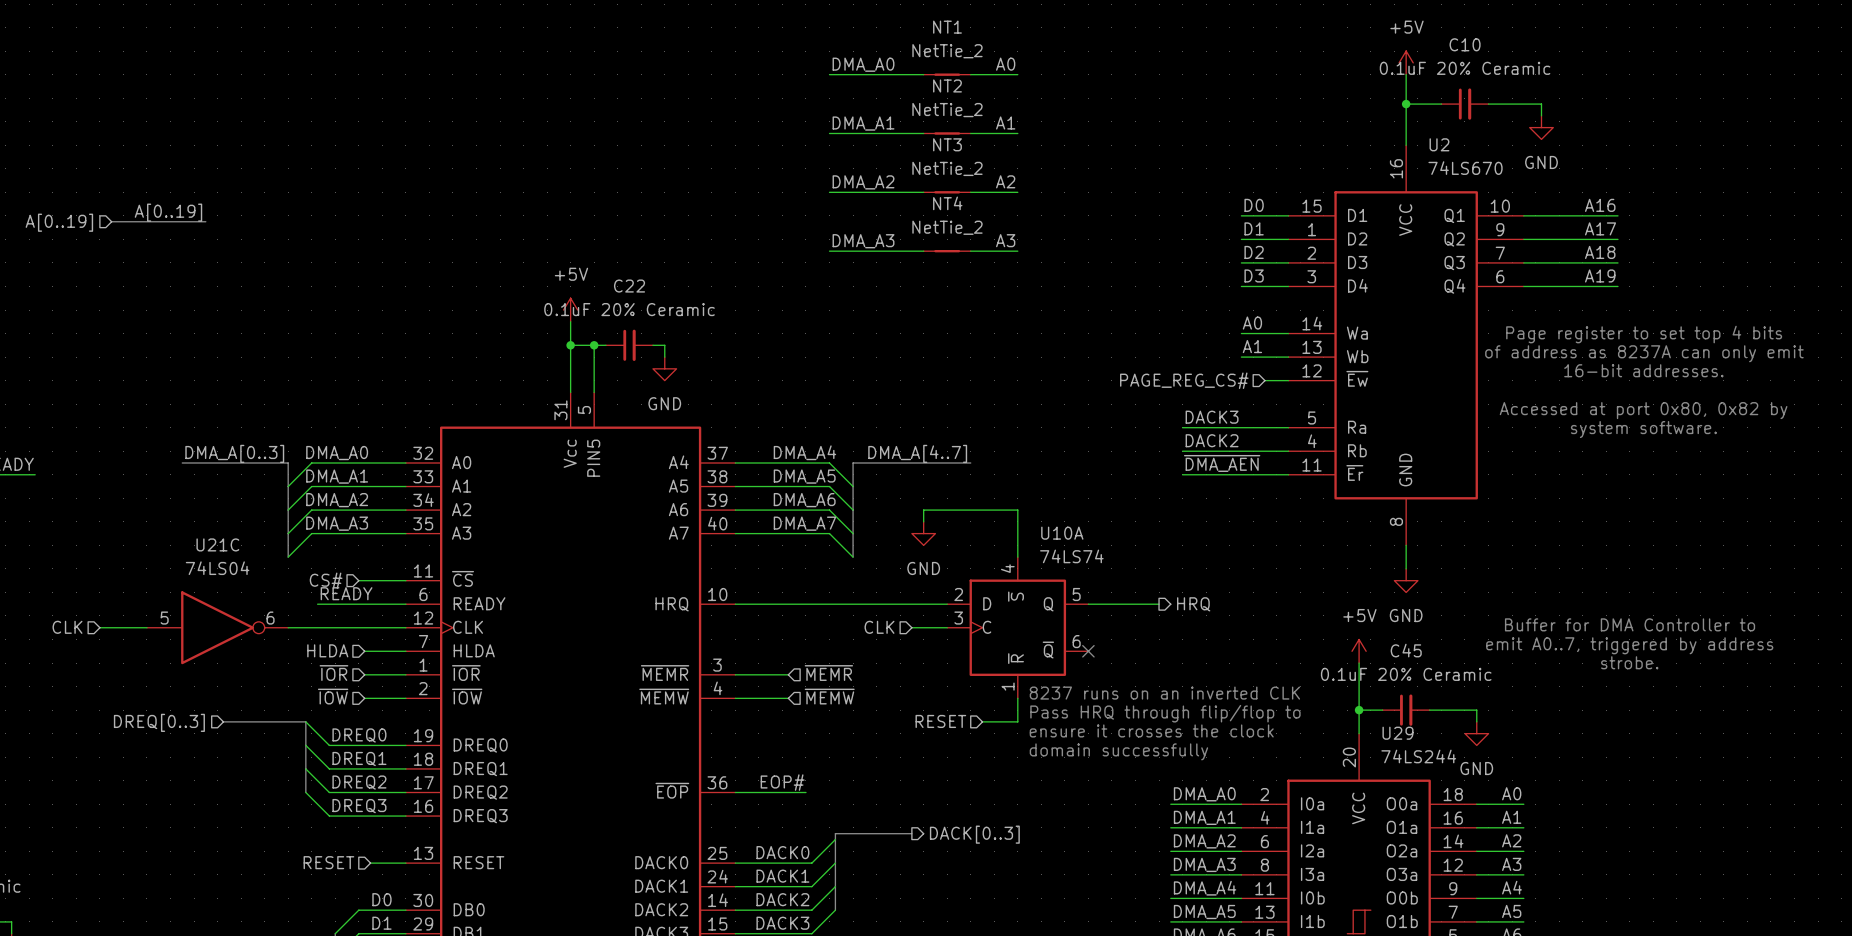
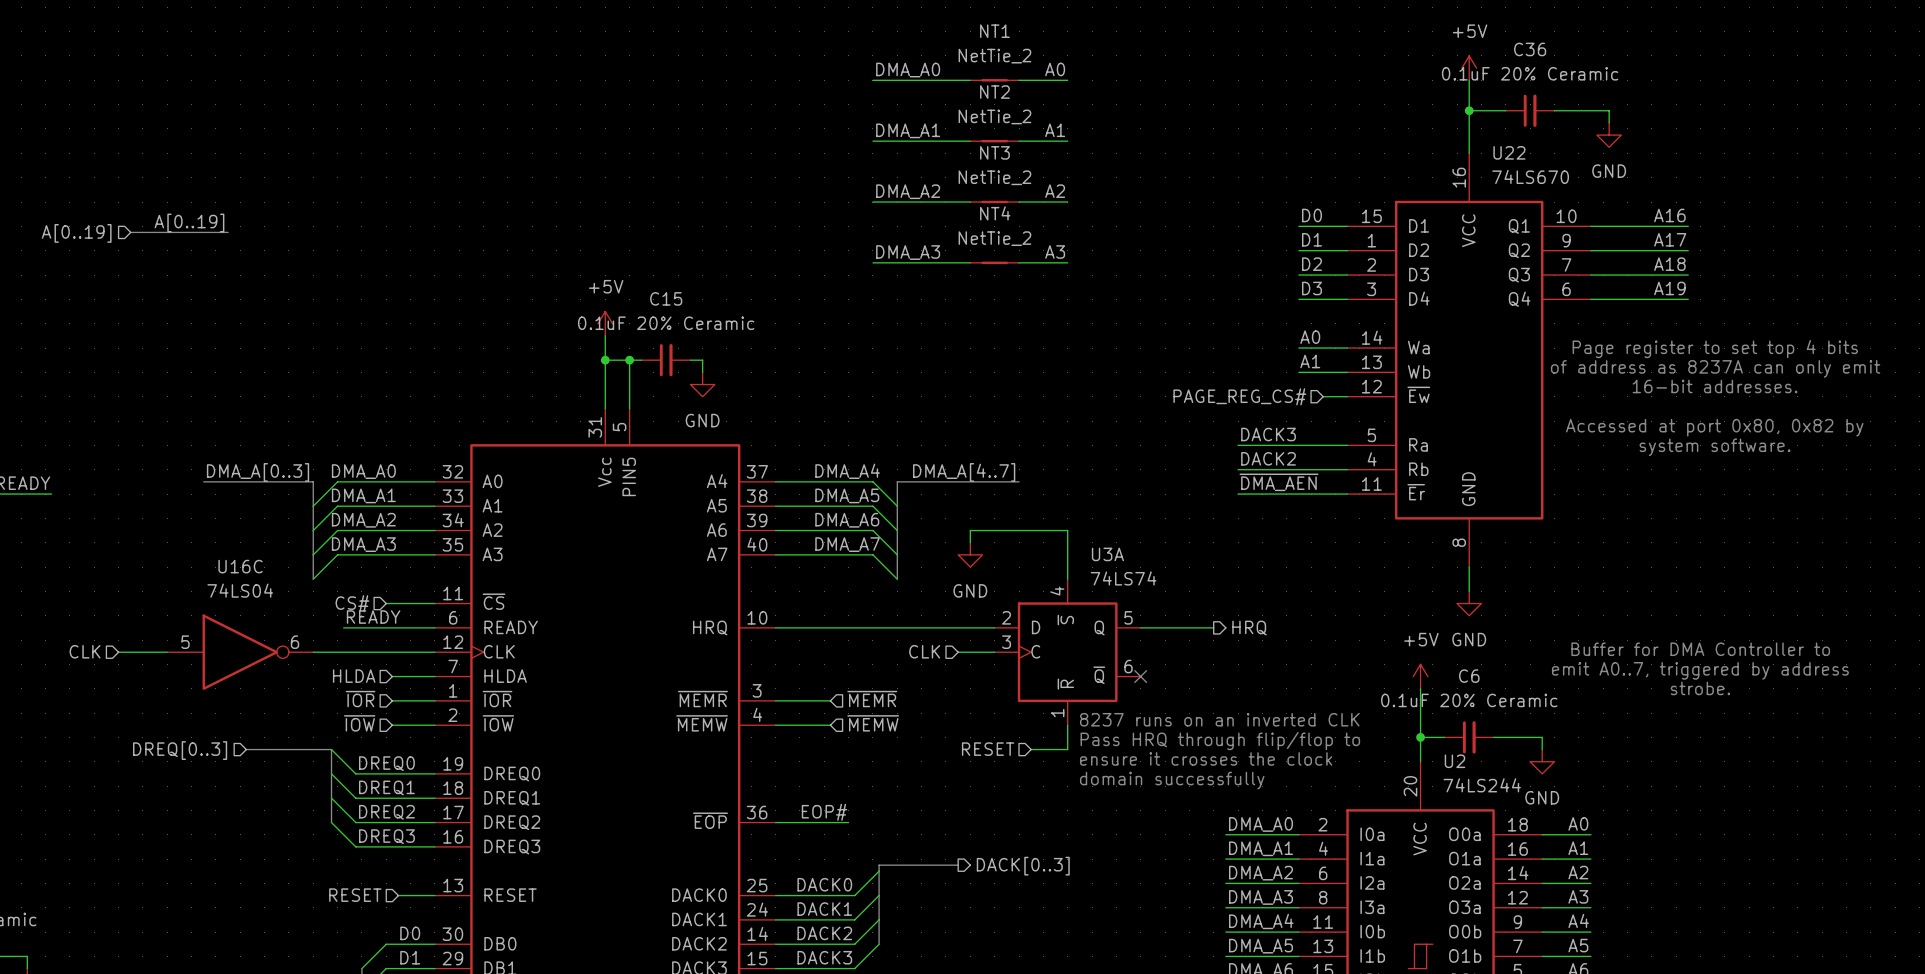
C10 name: C10 (1465, 44) -> C36 (1530, 49)
U2 name: U2 (1439, 144) -> U22 (1509, 152)
C22 name: C22 (629, 286) -> C15 (666, 298)
U10A name: U10A (1062, 533) -> U3A (1107, 554)
U21C name: U21C (217, 544) -> U16C (240, 566)
C45 name: C45 (1406, 650) -> C6 (1469, 676)
U29 name: U29 (1397, 733) -> U2 (1454, 761)

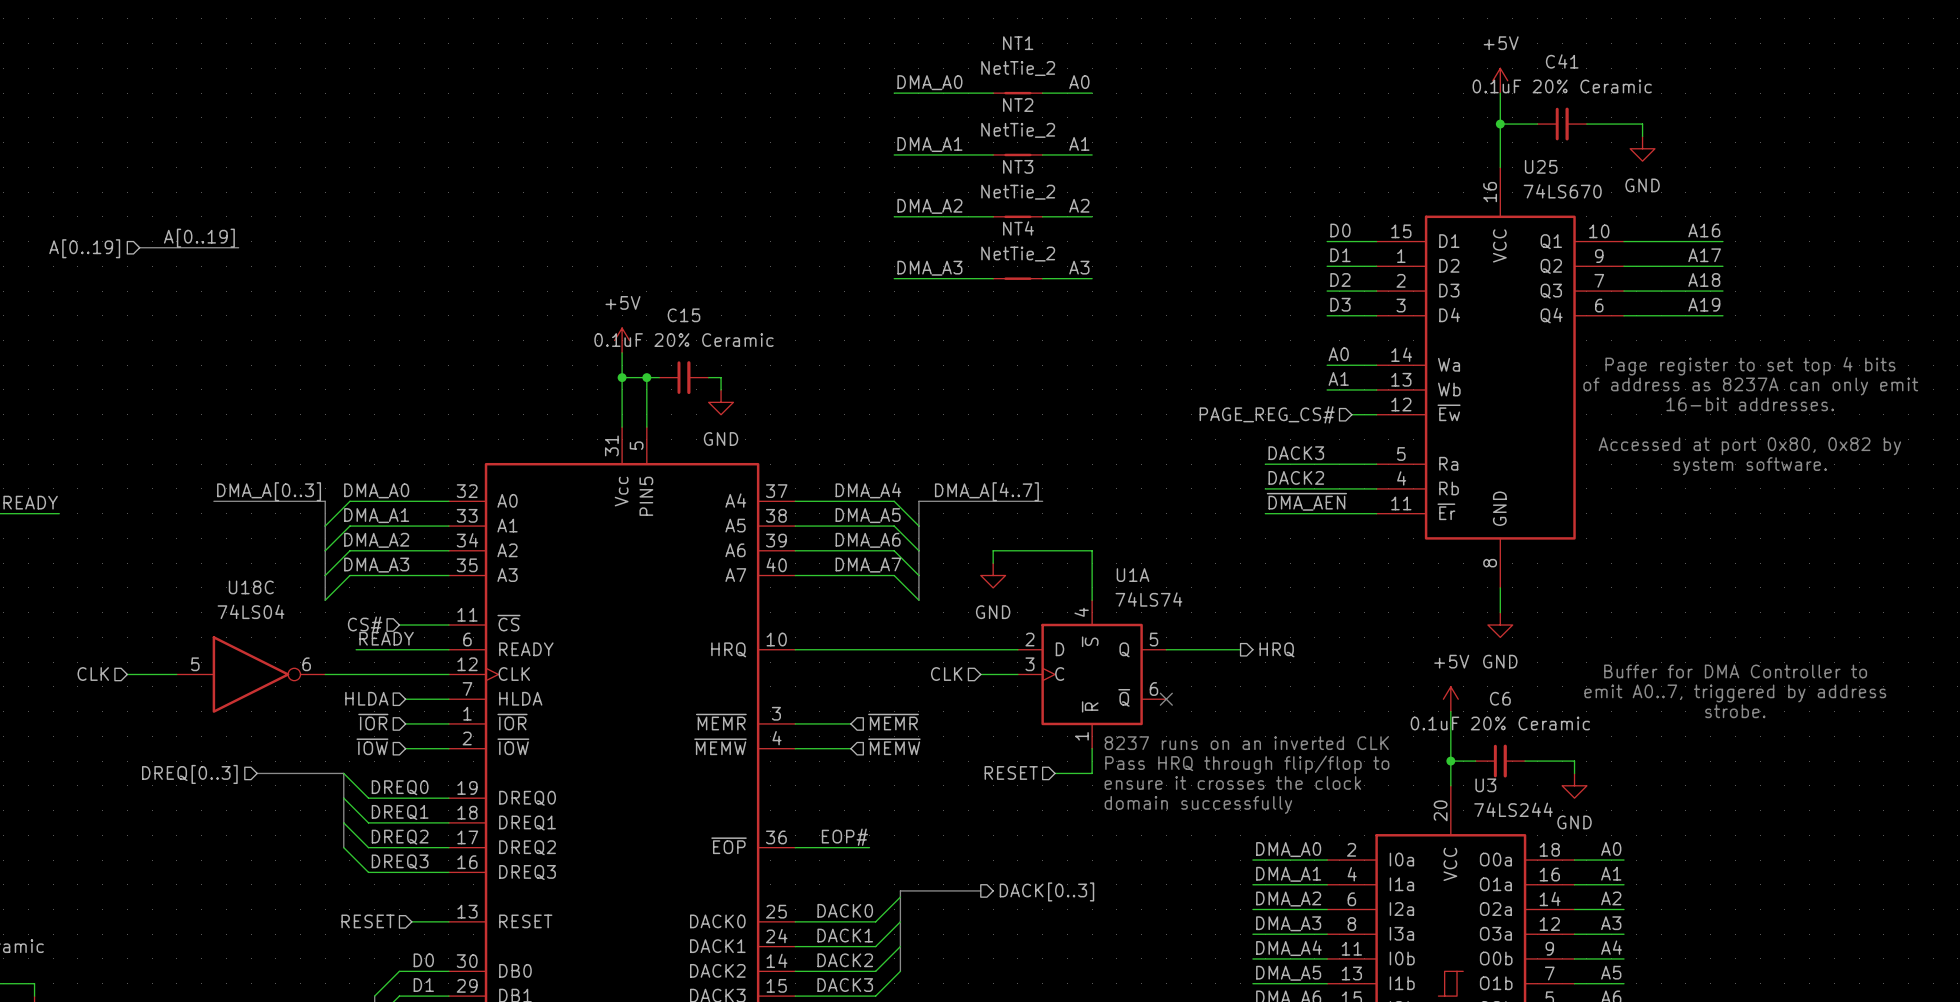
C36 name: C36 (1530, 49) -> C41 (1562, 61)
U22 name: U22 (1509, 152) -> U25 (1541, 166)
U3A name: U3A (1107, 554) -> U1A (1133, 575)
U16C name: U16C (240, 566) -> U18C (251, 587)
U2 name: U2 (1454, 761) -> U3 (1485, 785)

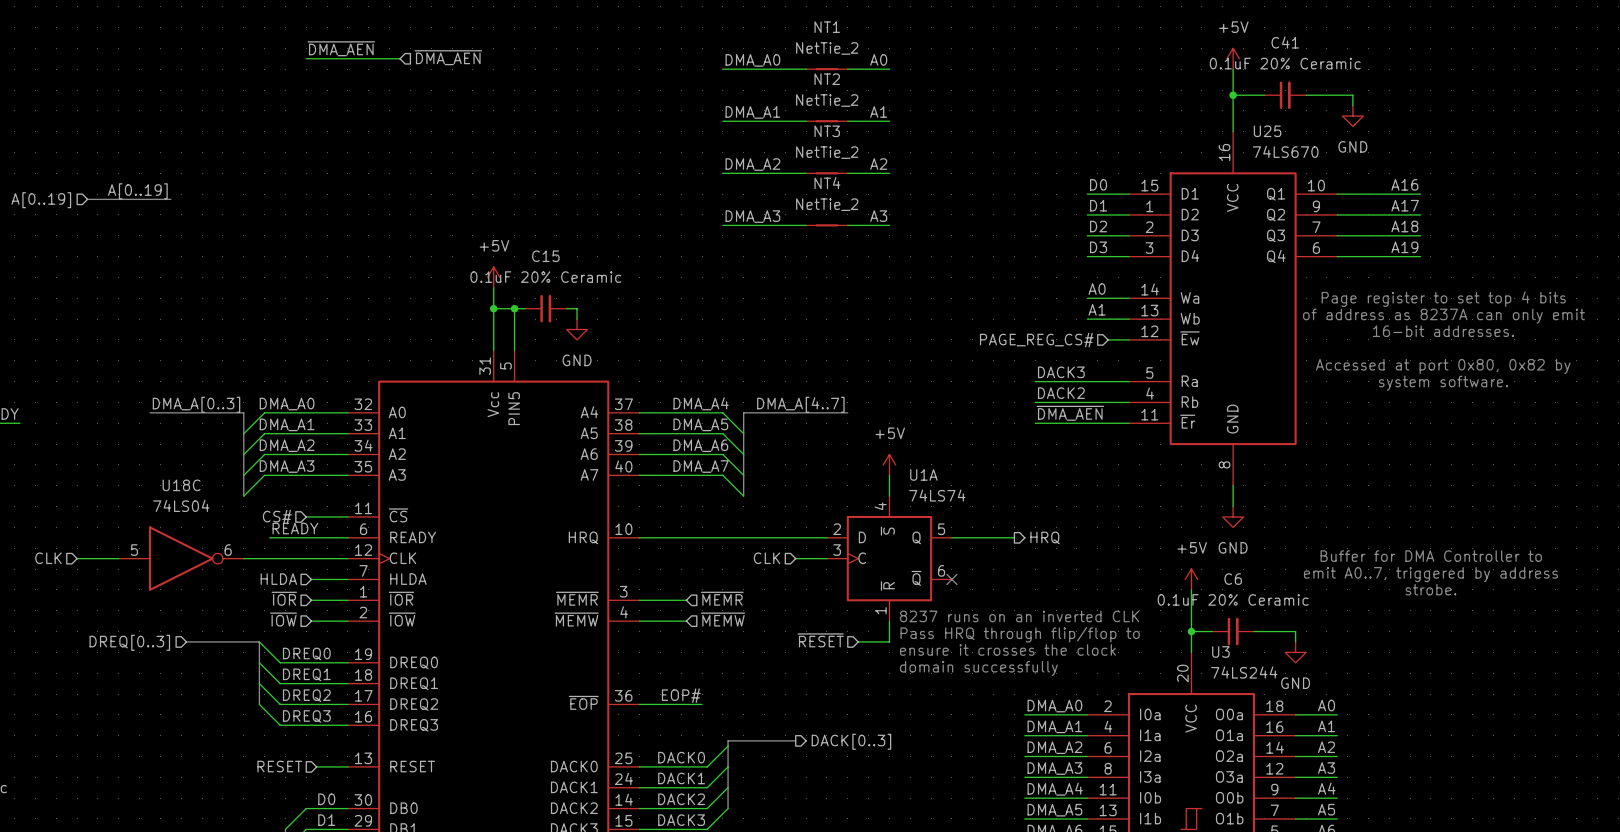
label: none -> ~{DMA_AEN} (341, 48)
hierarchical label: none -> ~{DMA_AEN} (448, 57)
wire: none -> (306, 58) (400, 58)
wire: (993, 563) (993, 550) (1092, 550) (1092, 575) -> none
power symbol: none -> +5V (889, 464)
power symbol: GND (993, 575) -> none
hierarchical label: RESET (1011, 772) -> ~{RESET} (820, 640)

